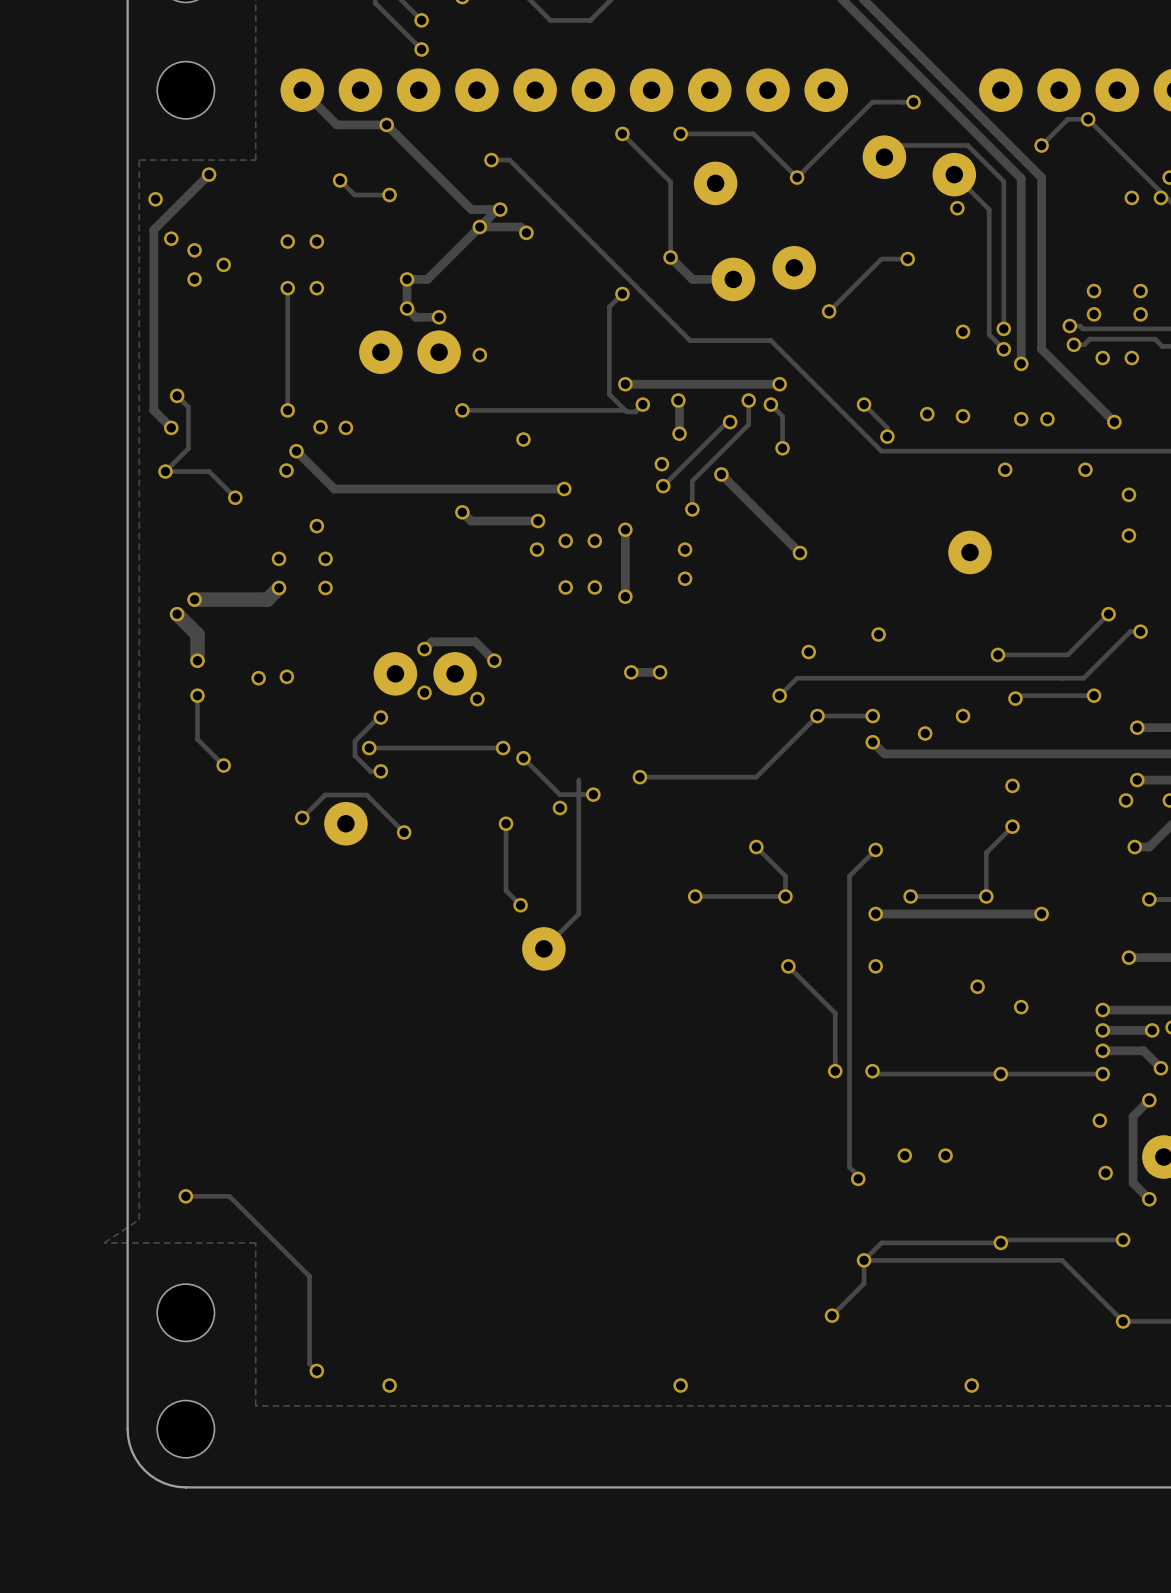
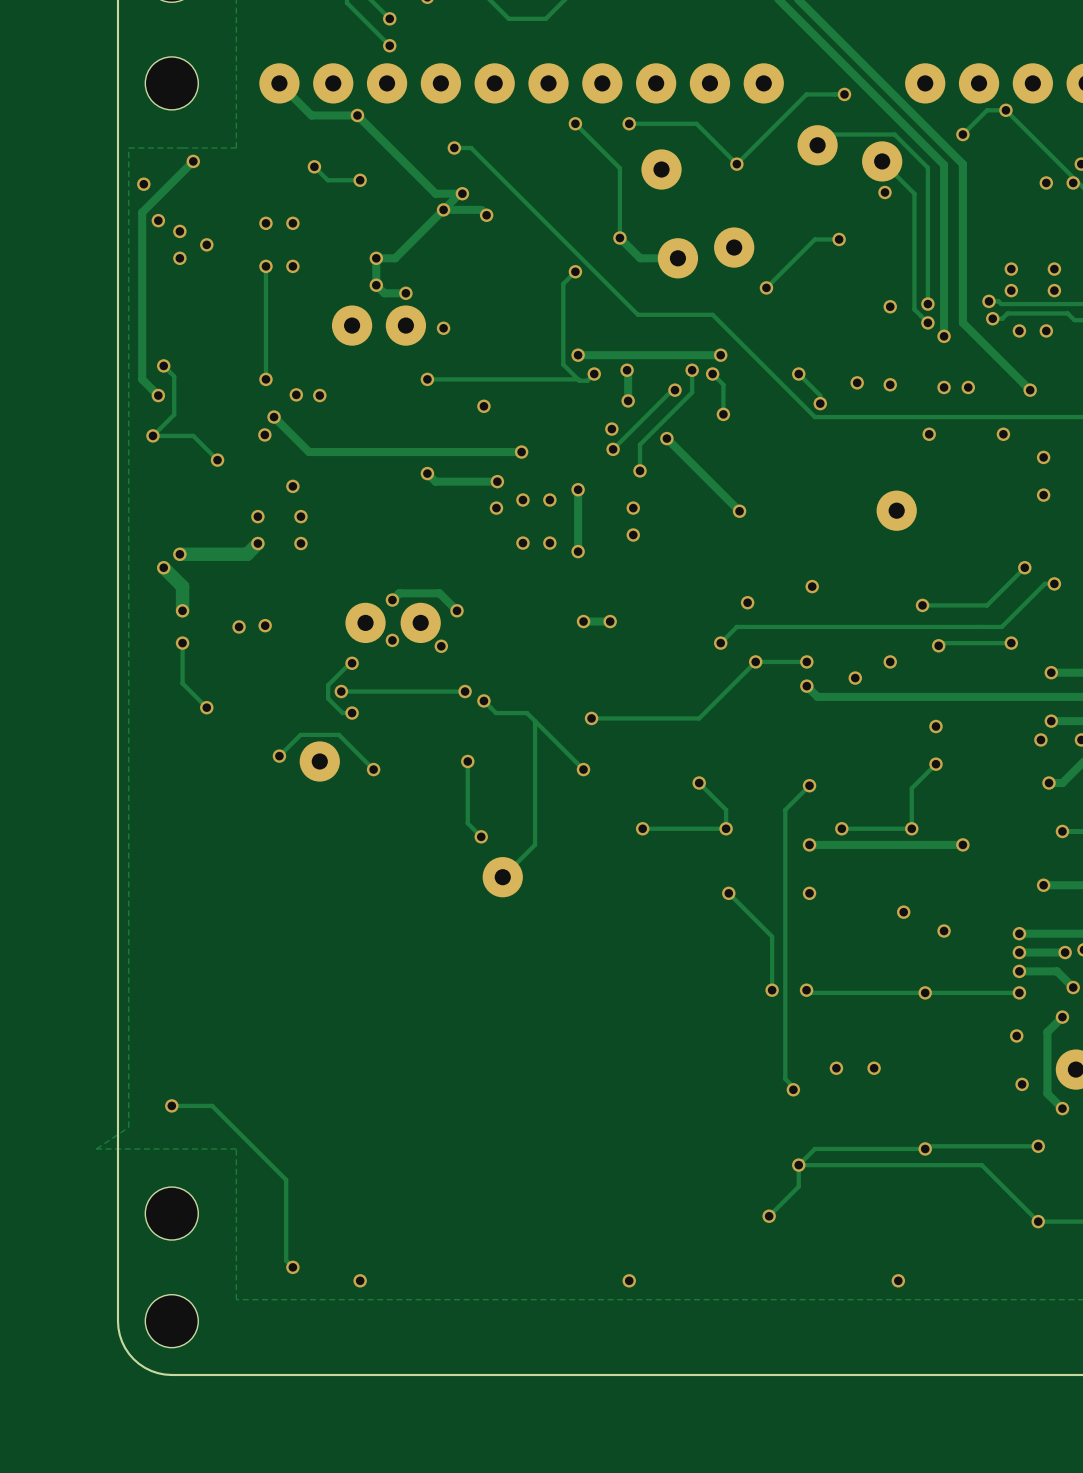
track: (536, 771) (559, 794) (593, 794) -> (496, 713) (526, 713) (583, 769)
via: (593, 794) -> none
via: (560, 808) -> none
via: none -> (583, 769)

